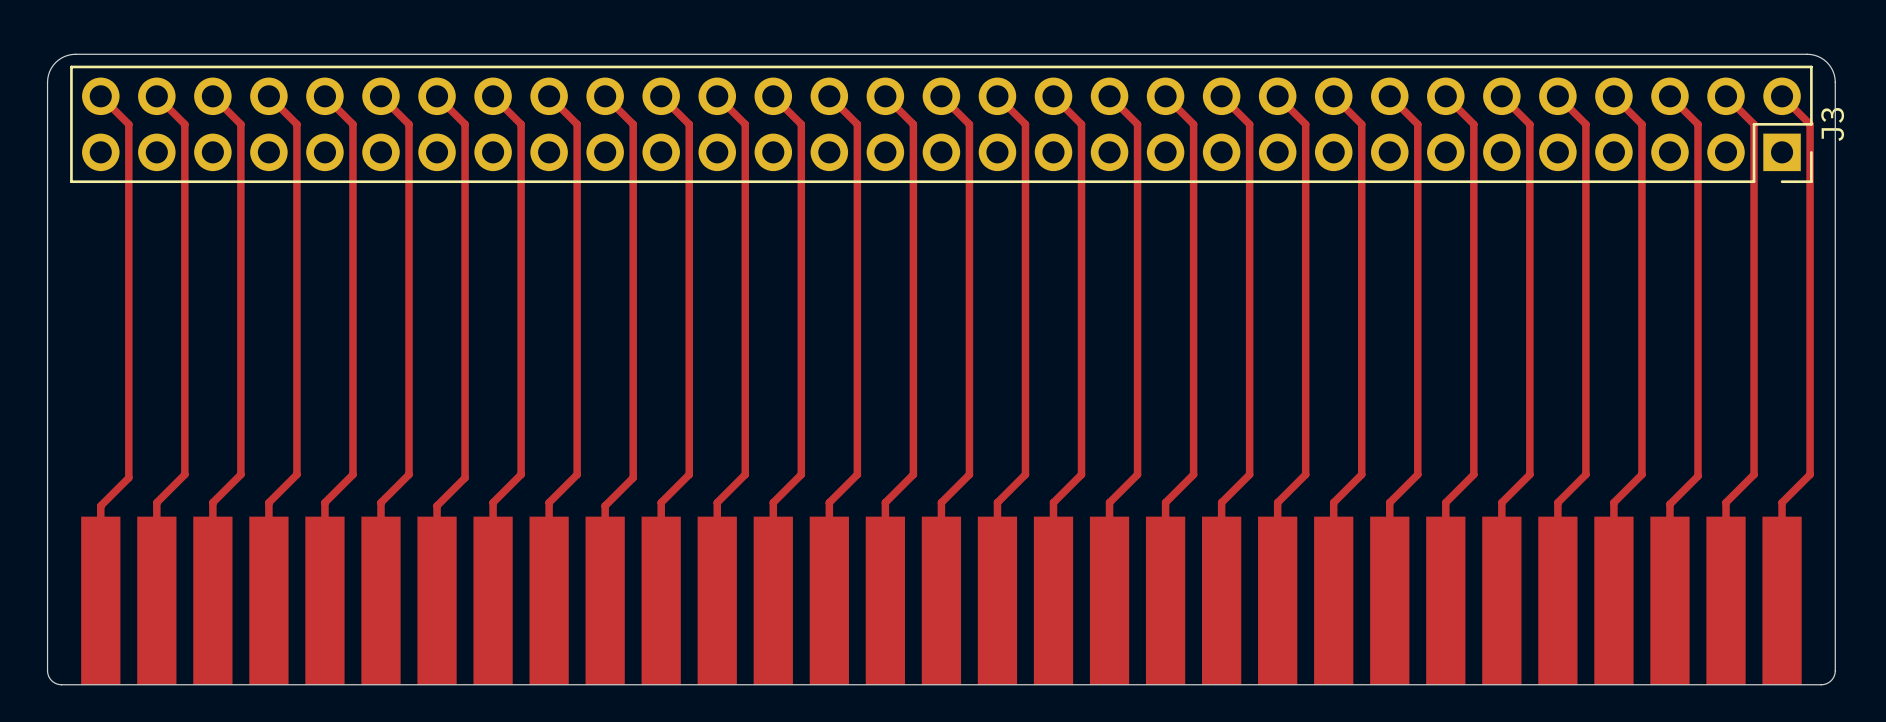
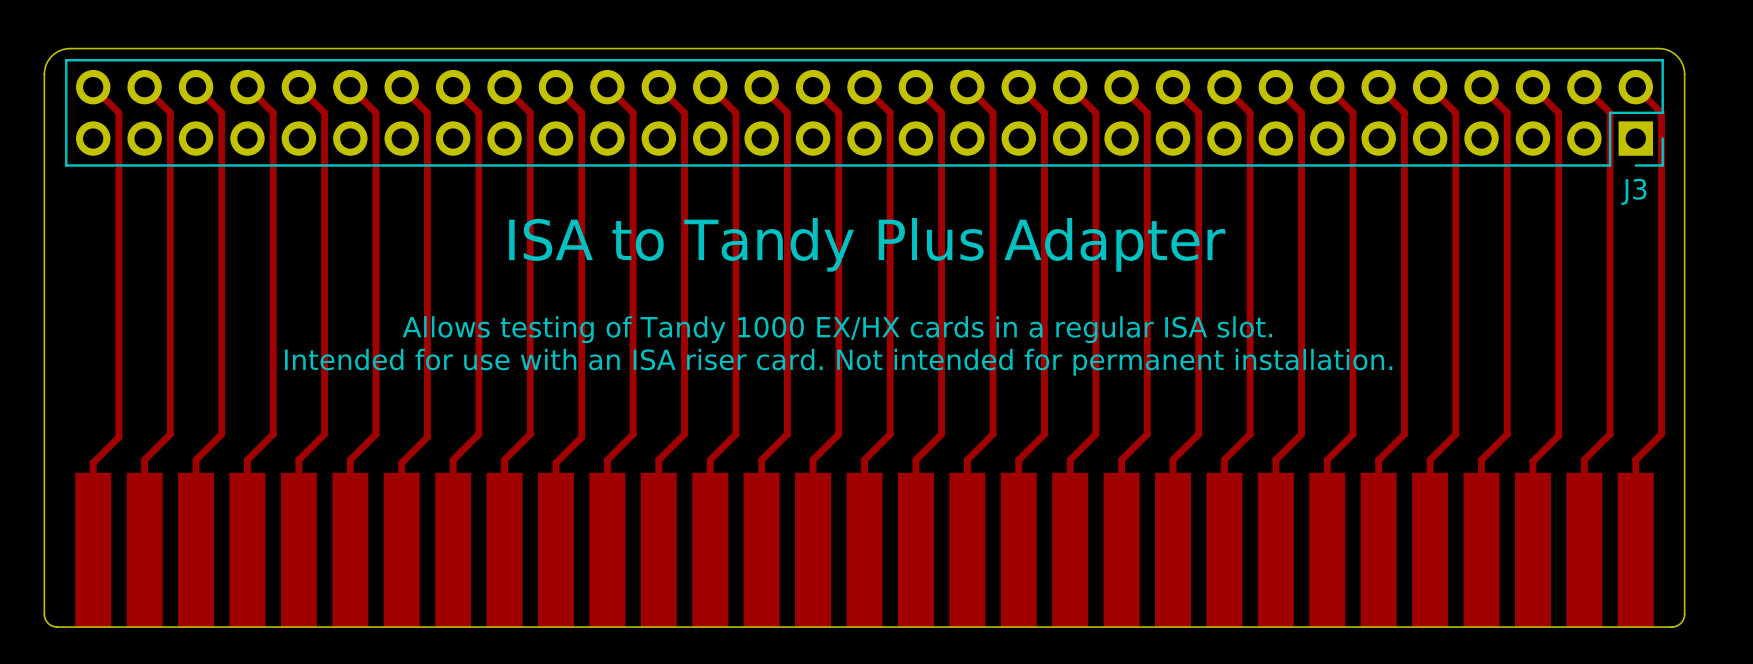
J3 name rotation: 0° (1832, 124) -> 90° clockwise (1633, 191)
J3 name position: J3 (1832, 124) -> J3 (1633, 191)
text: none -> ISA to Tandy Plus Adapter (867, 244)
text: none -> Allows testing of Tandy 1000 EX/HX cards in a regular ISA slot. (837, 329)
text: none -> Intended for use with an ISA riser card. Not intended for permanent installation. (838, 362)

